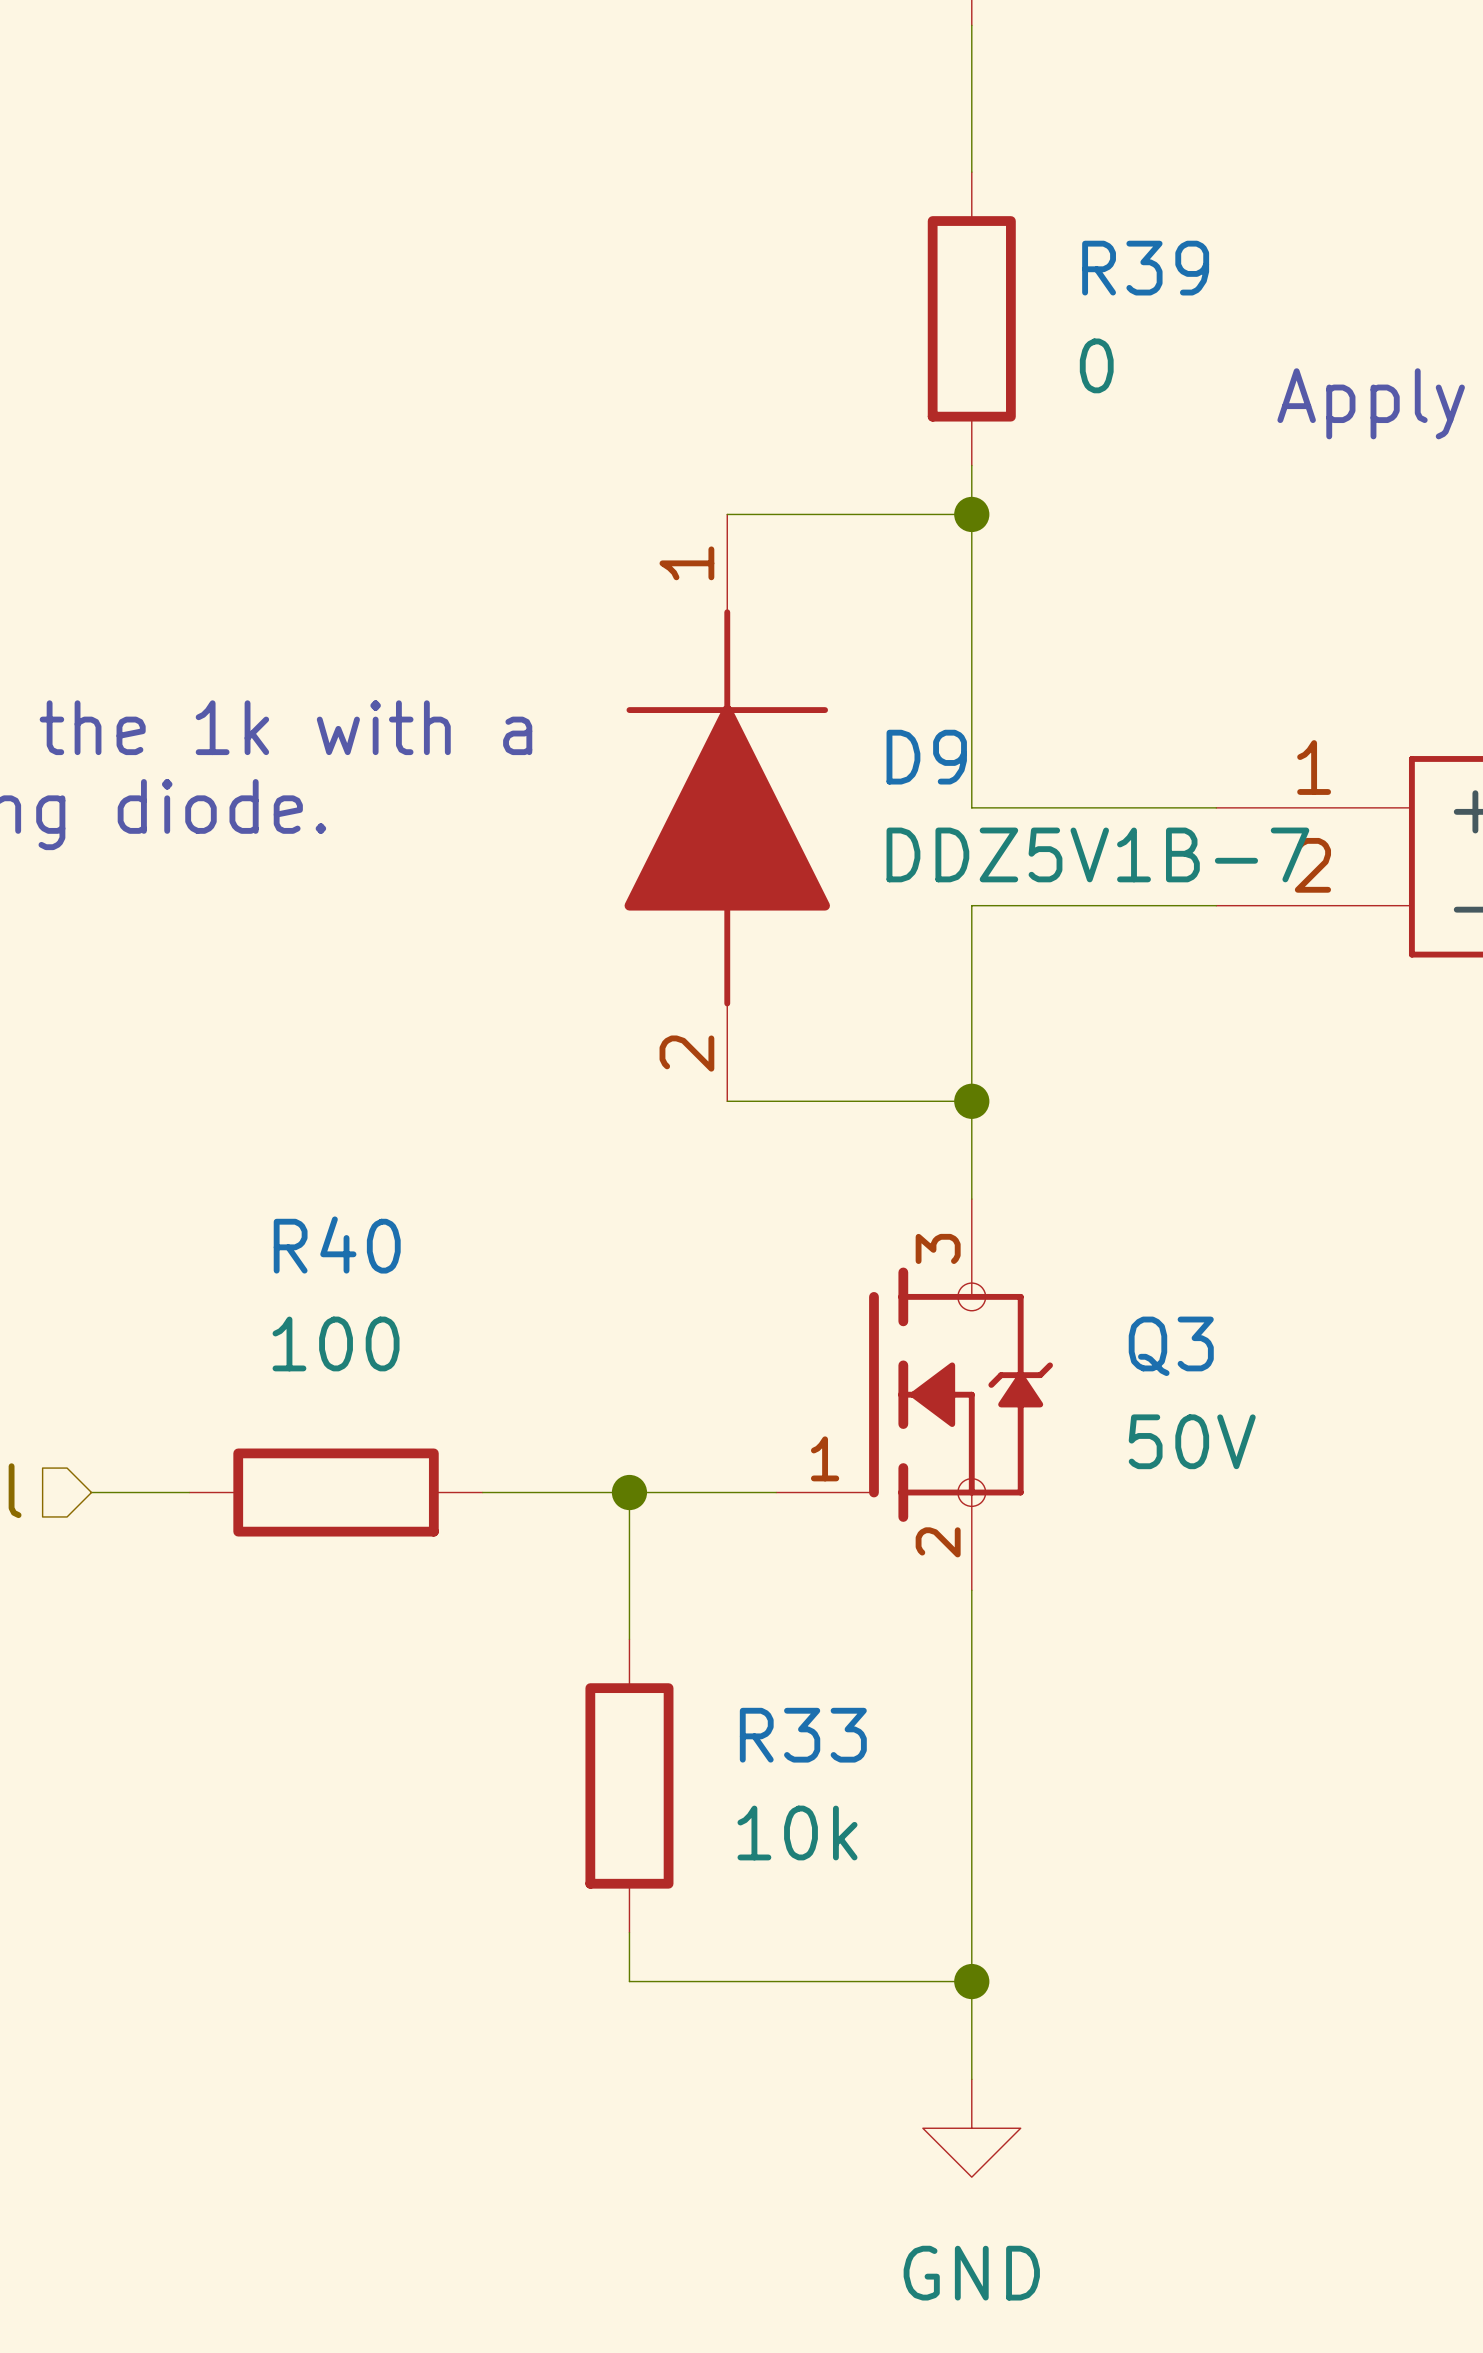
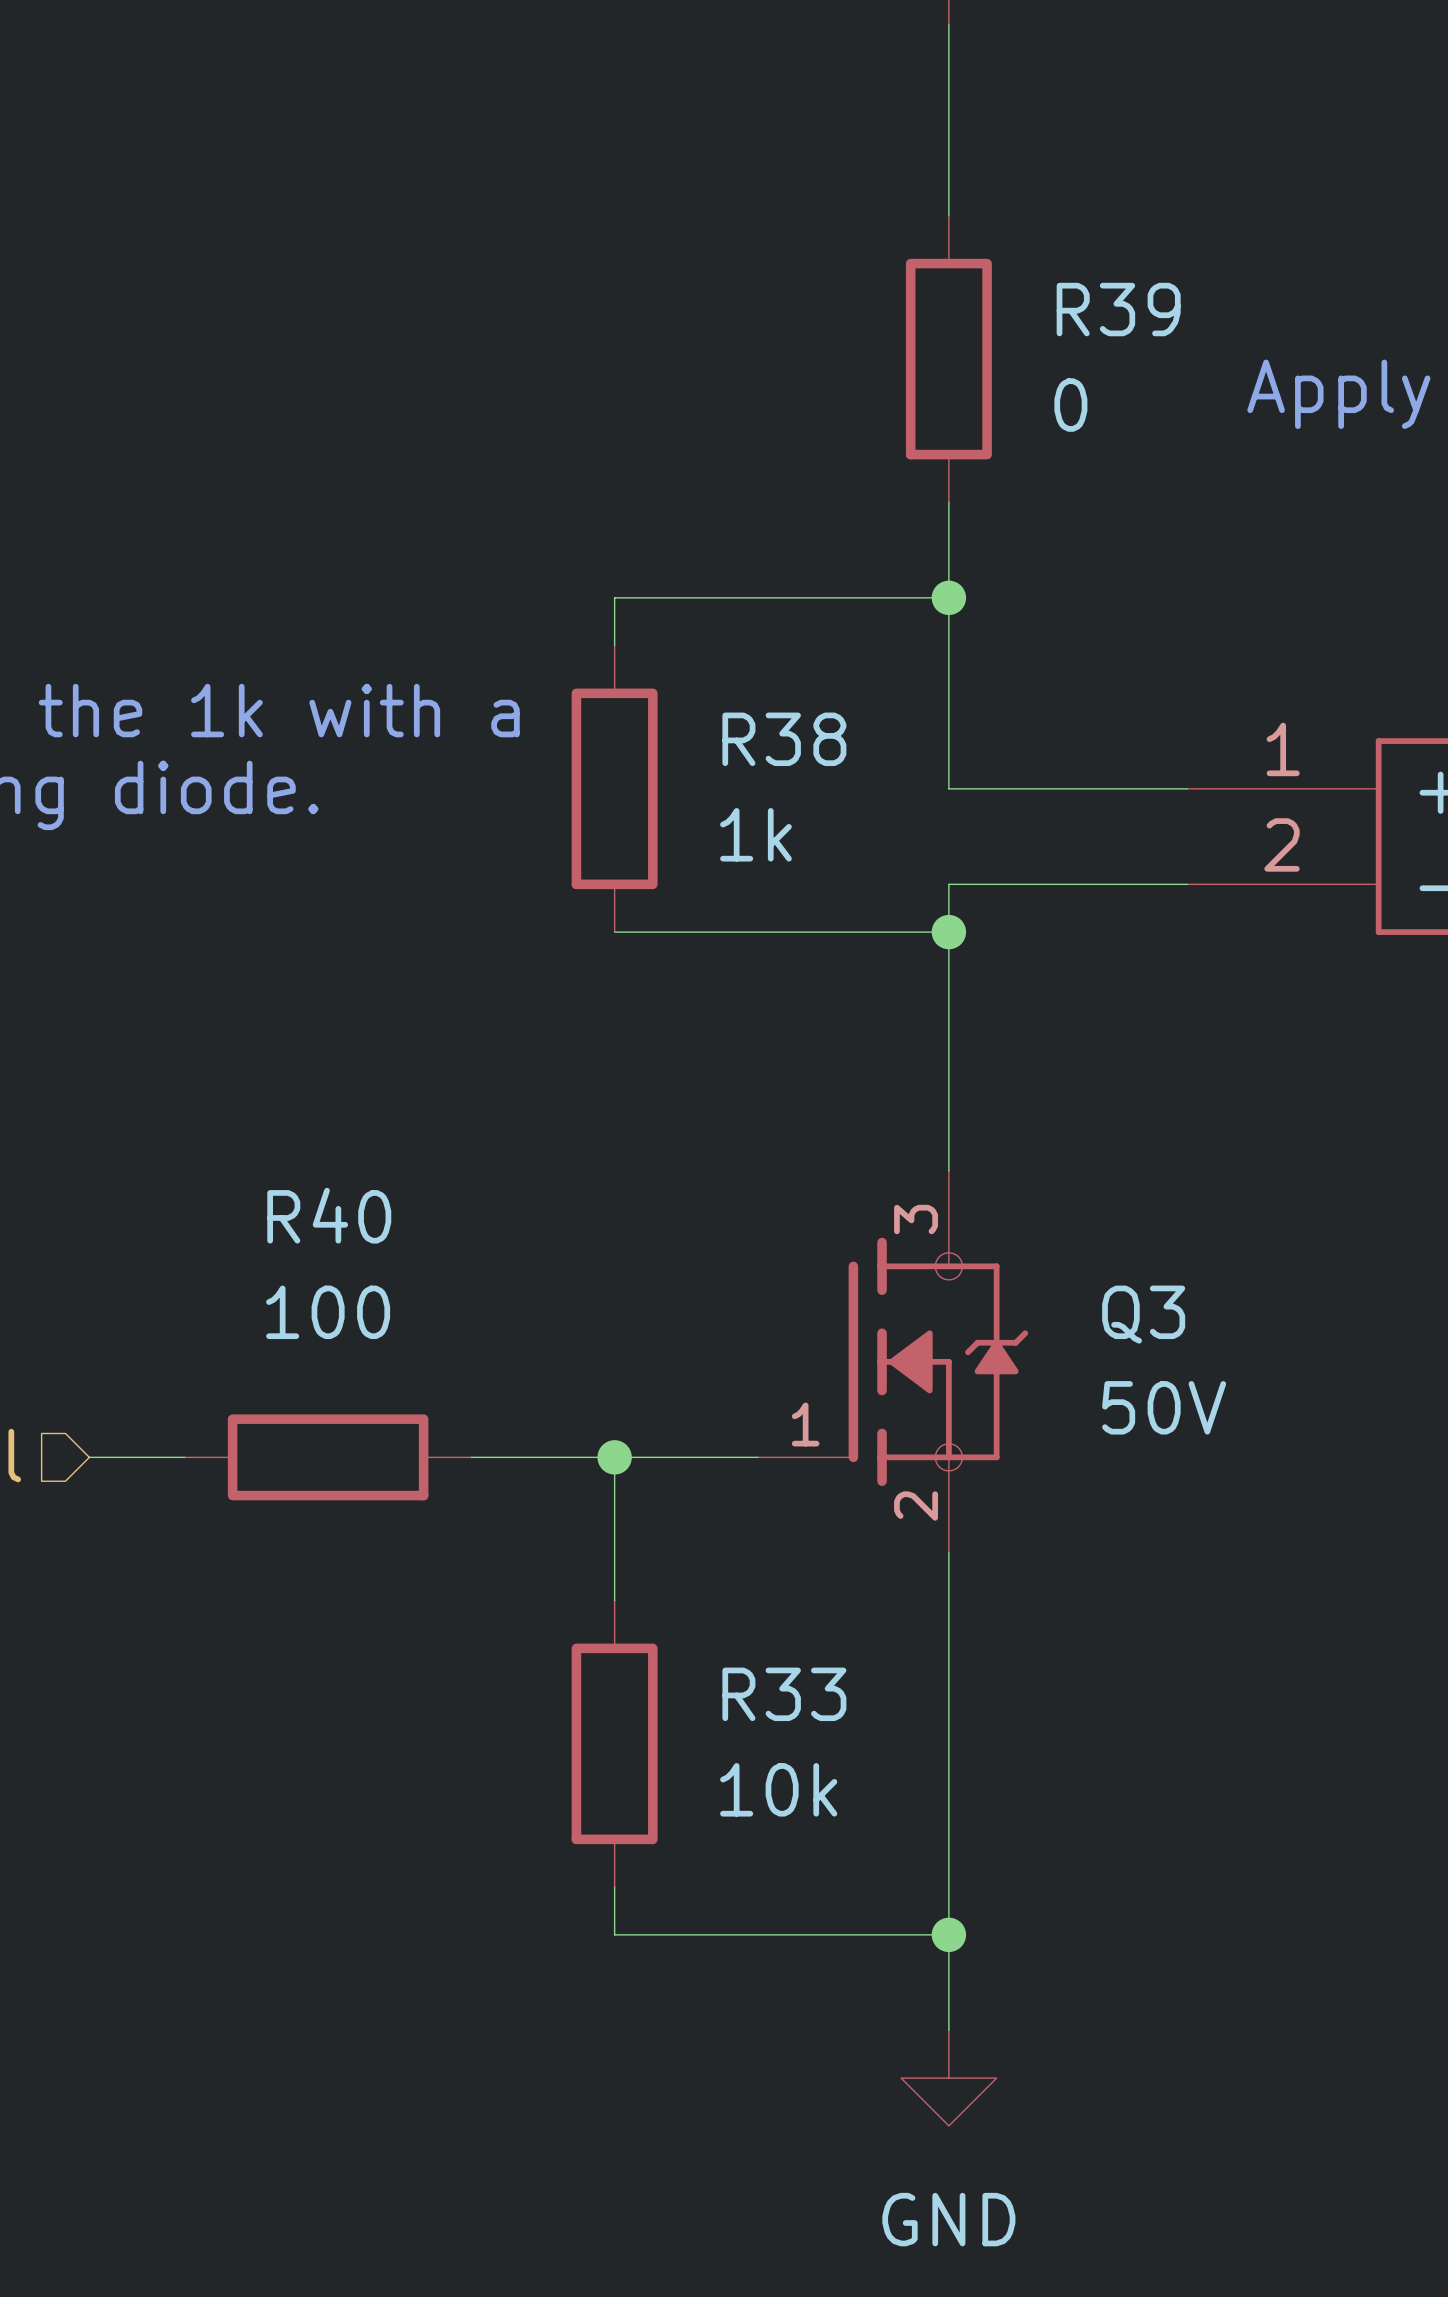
R39 position: (971, 318) -> (948, 359)
wire: (971, 465) (971, 514) (727, 514) -> none
junction position: (971, 514) -> (948, 597)
wire: none -> (948, 597) (614, 597) (614, 645)
R38: none -> 1k (614, 788)
D9: DDZ5V1B-7 (727, 807) -> none
wire: none -> (614, 932) (948, 932)
wire: (727, 1101) (971, 1101) -> none
junction position: (971, 1101) -> (948, 932)

